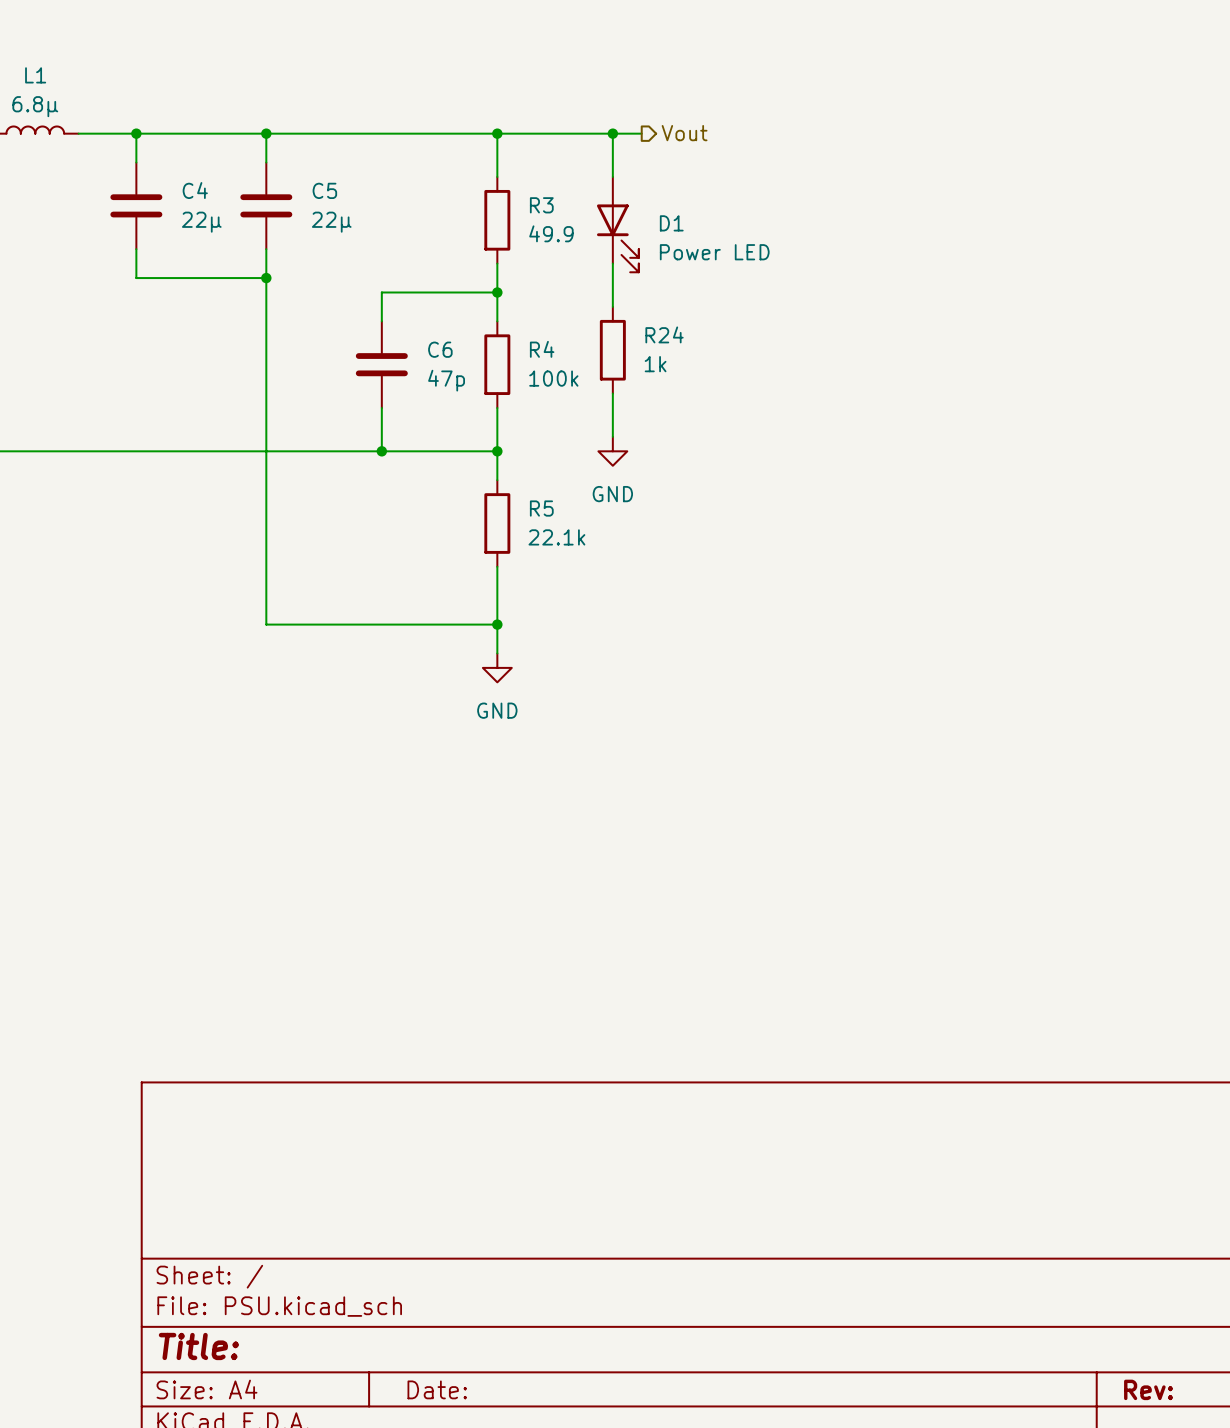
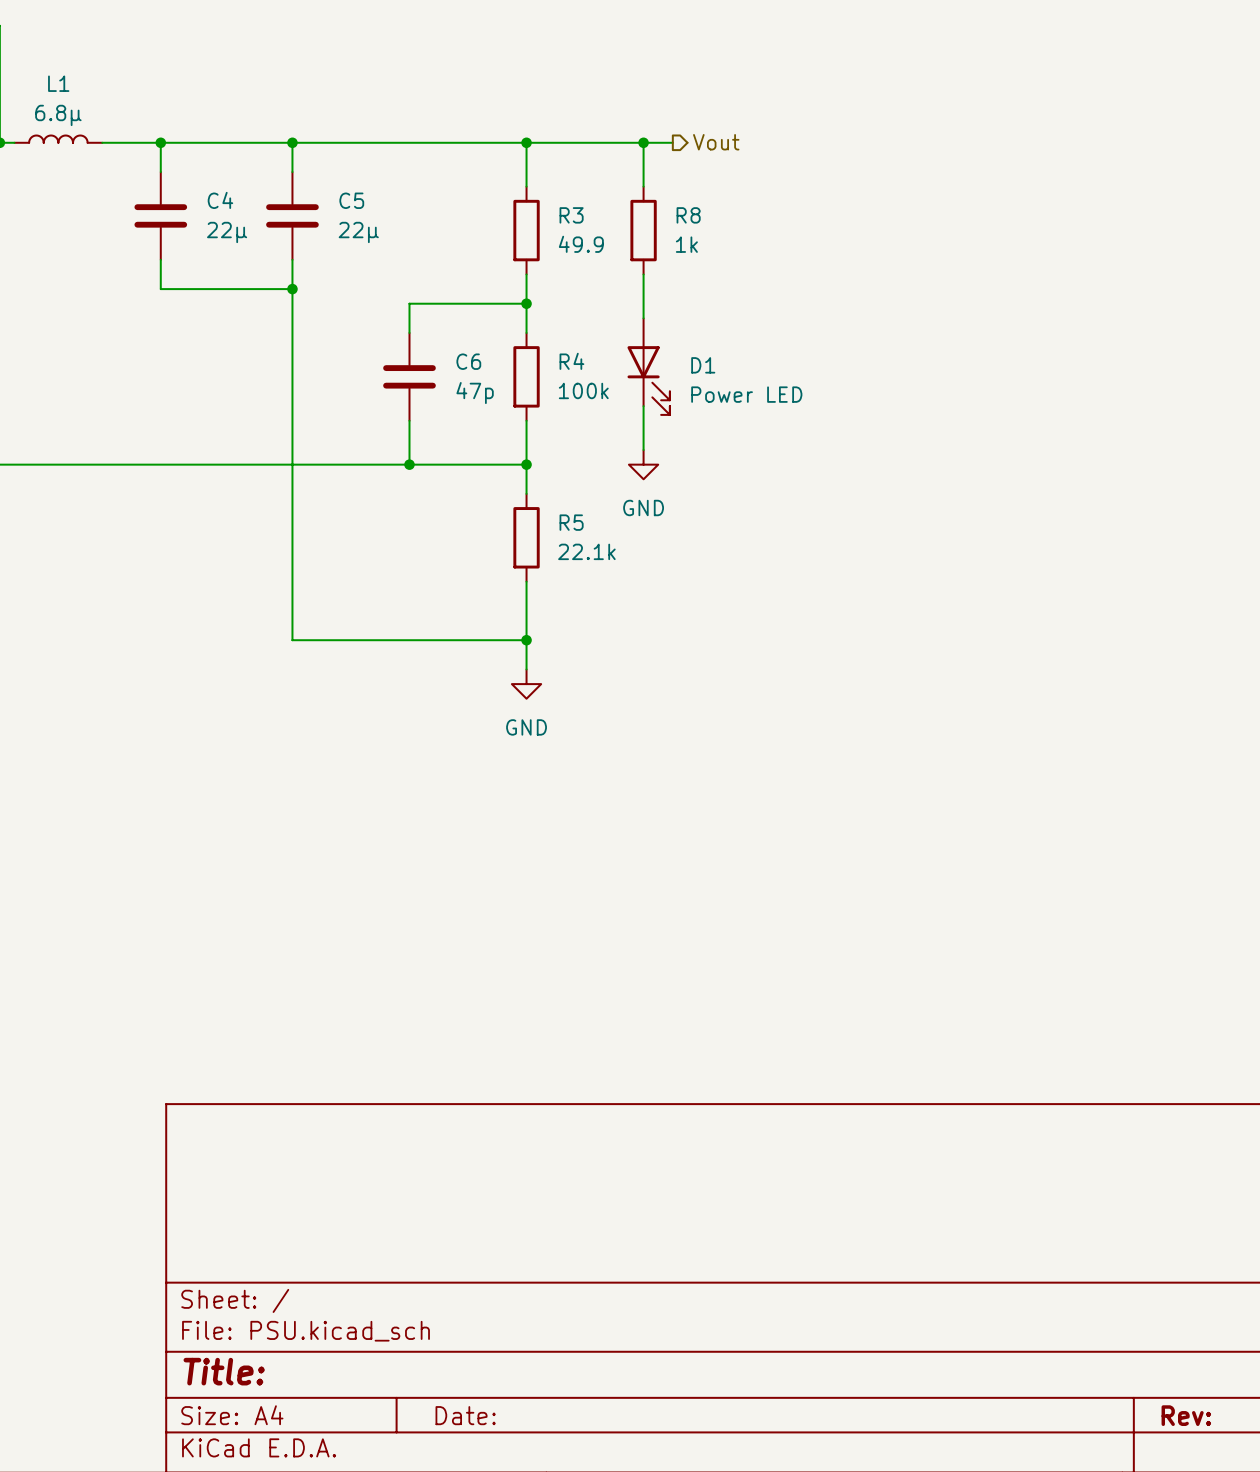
R8: none -> 1k (643, 230)
D1 position: (617, 224) -> (648, 366)
R24: 1k (612, 350) -> none

